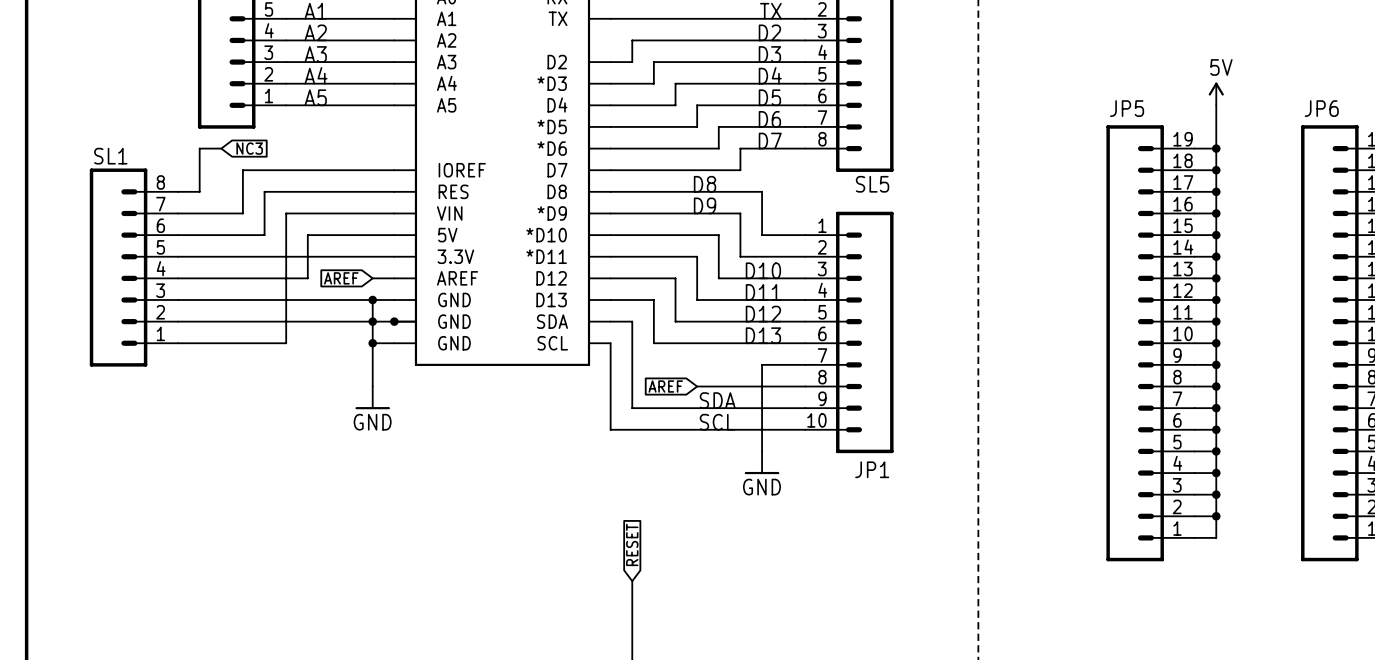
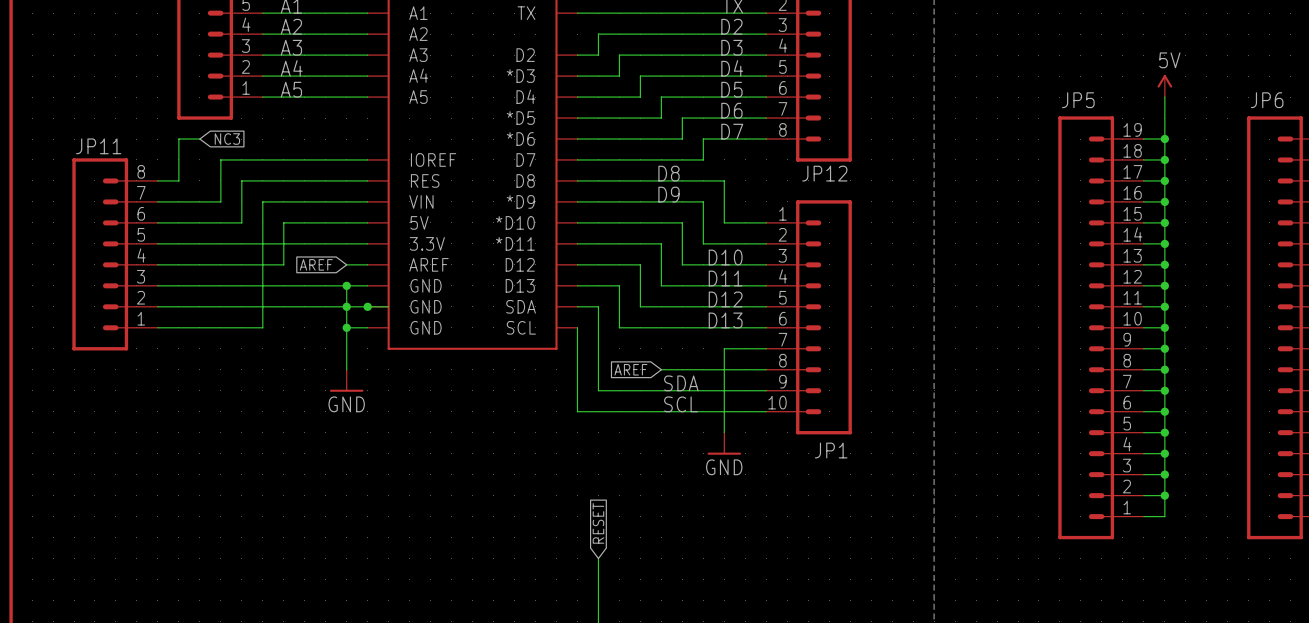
SL1 name: SL1 (110, 156) -> JP11 (98, 146)
SL5 name: SL5 (872, 184) -> JP12 (824, 173)

